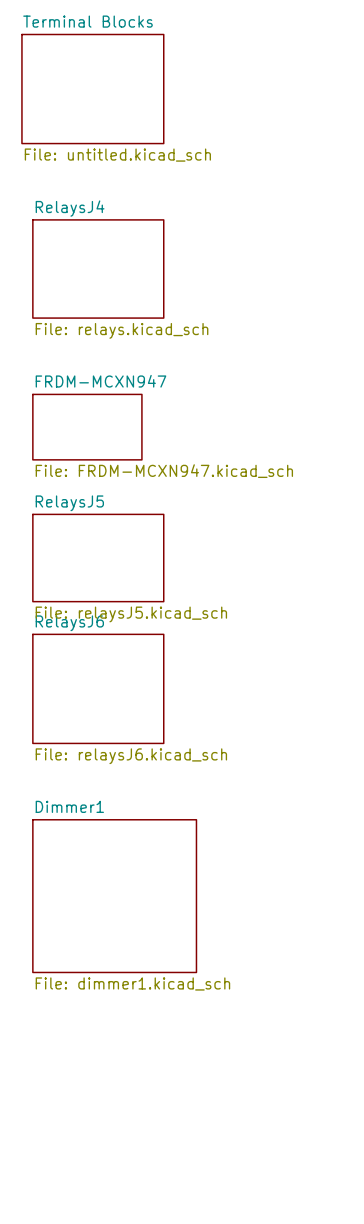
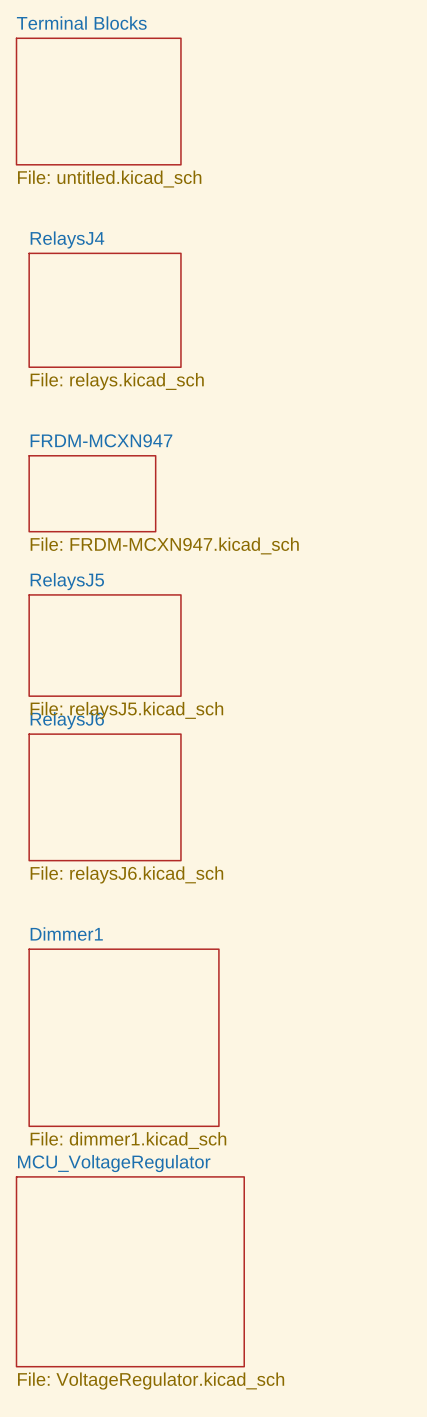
sheet MCU_VoltageRegulator: none -> File: VoltageRegulator.kicad_sch (130, 1271)

